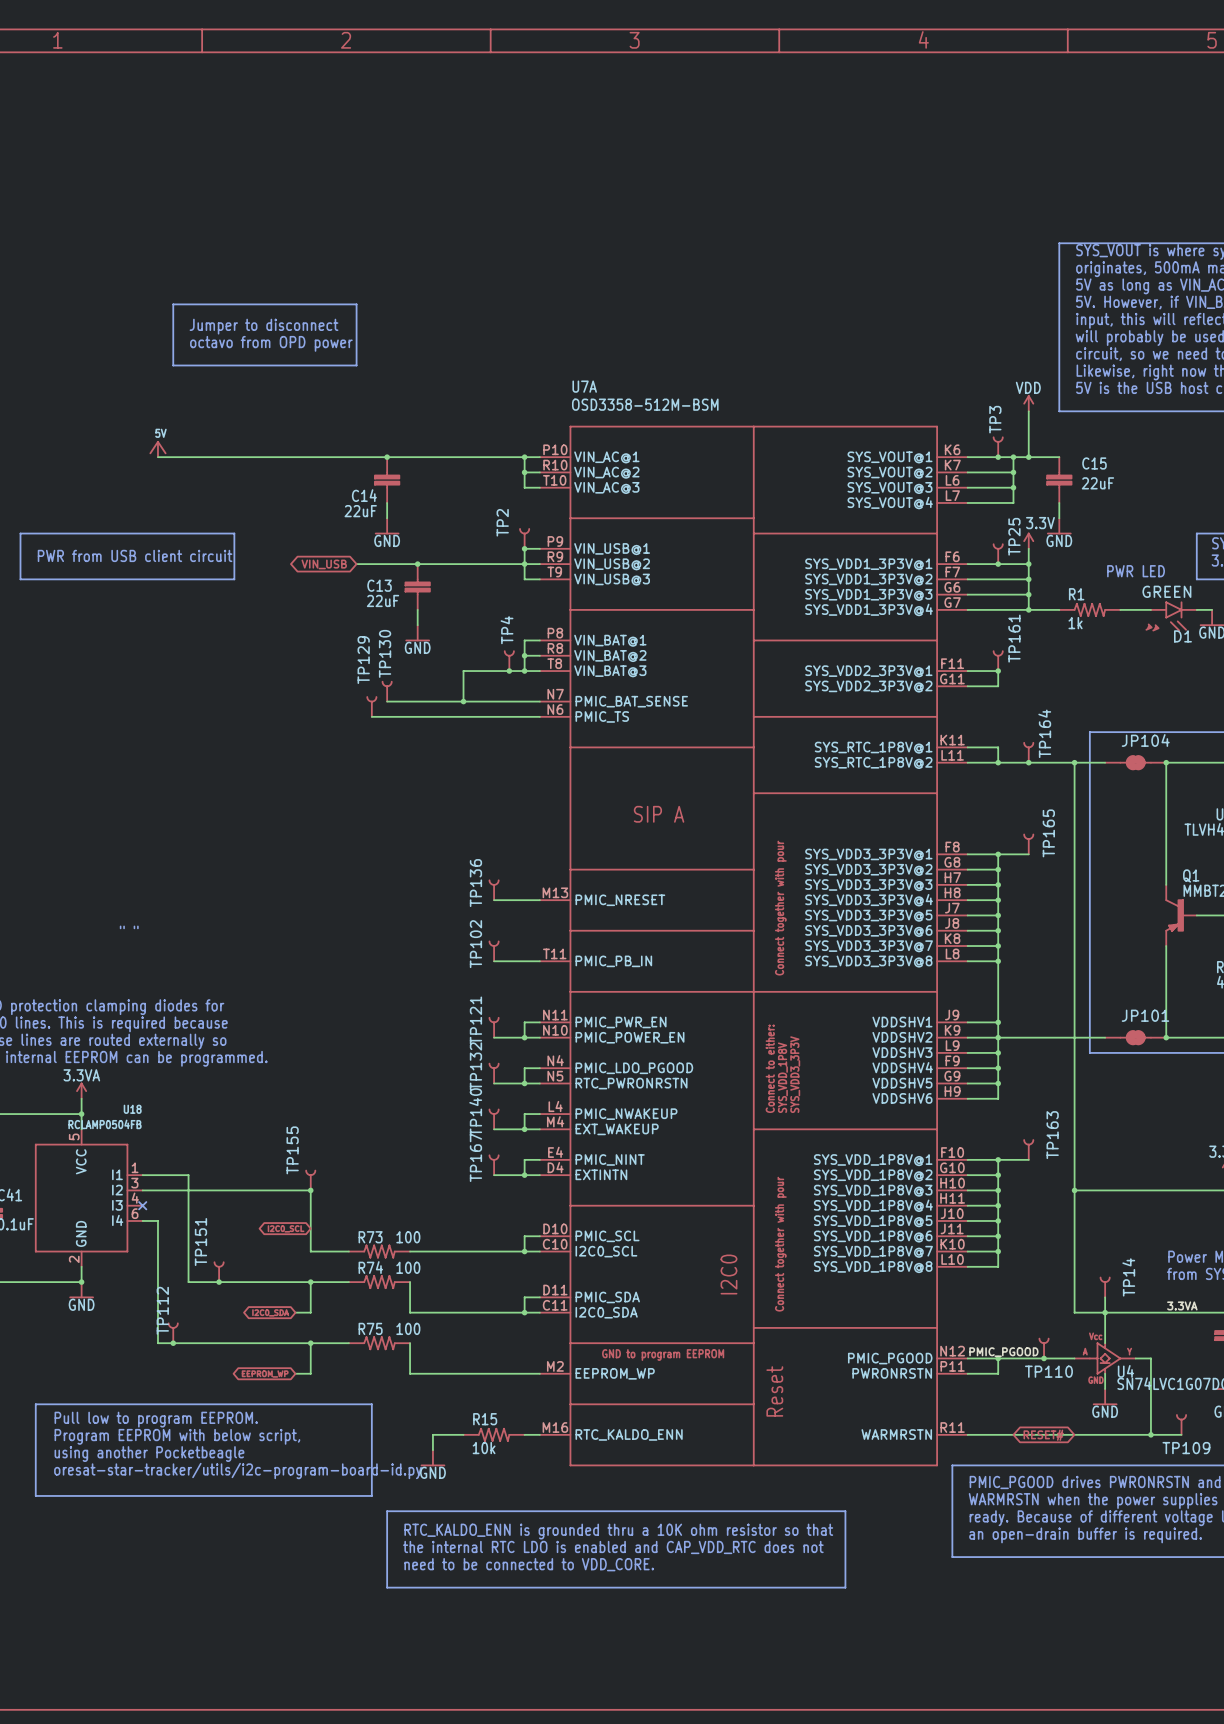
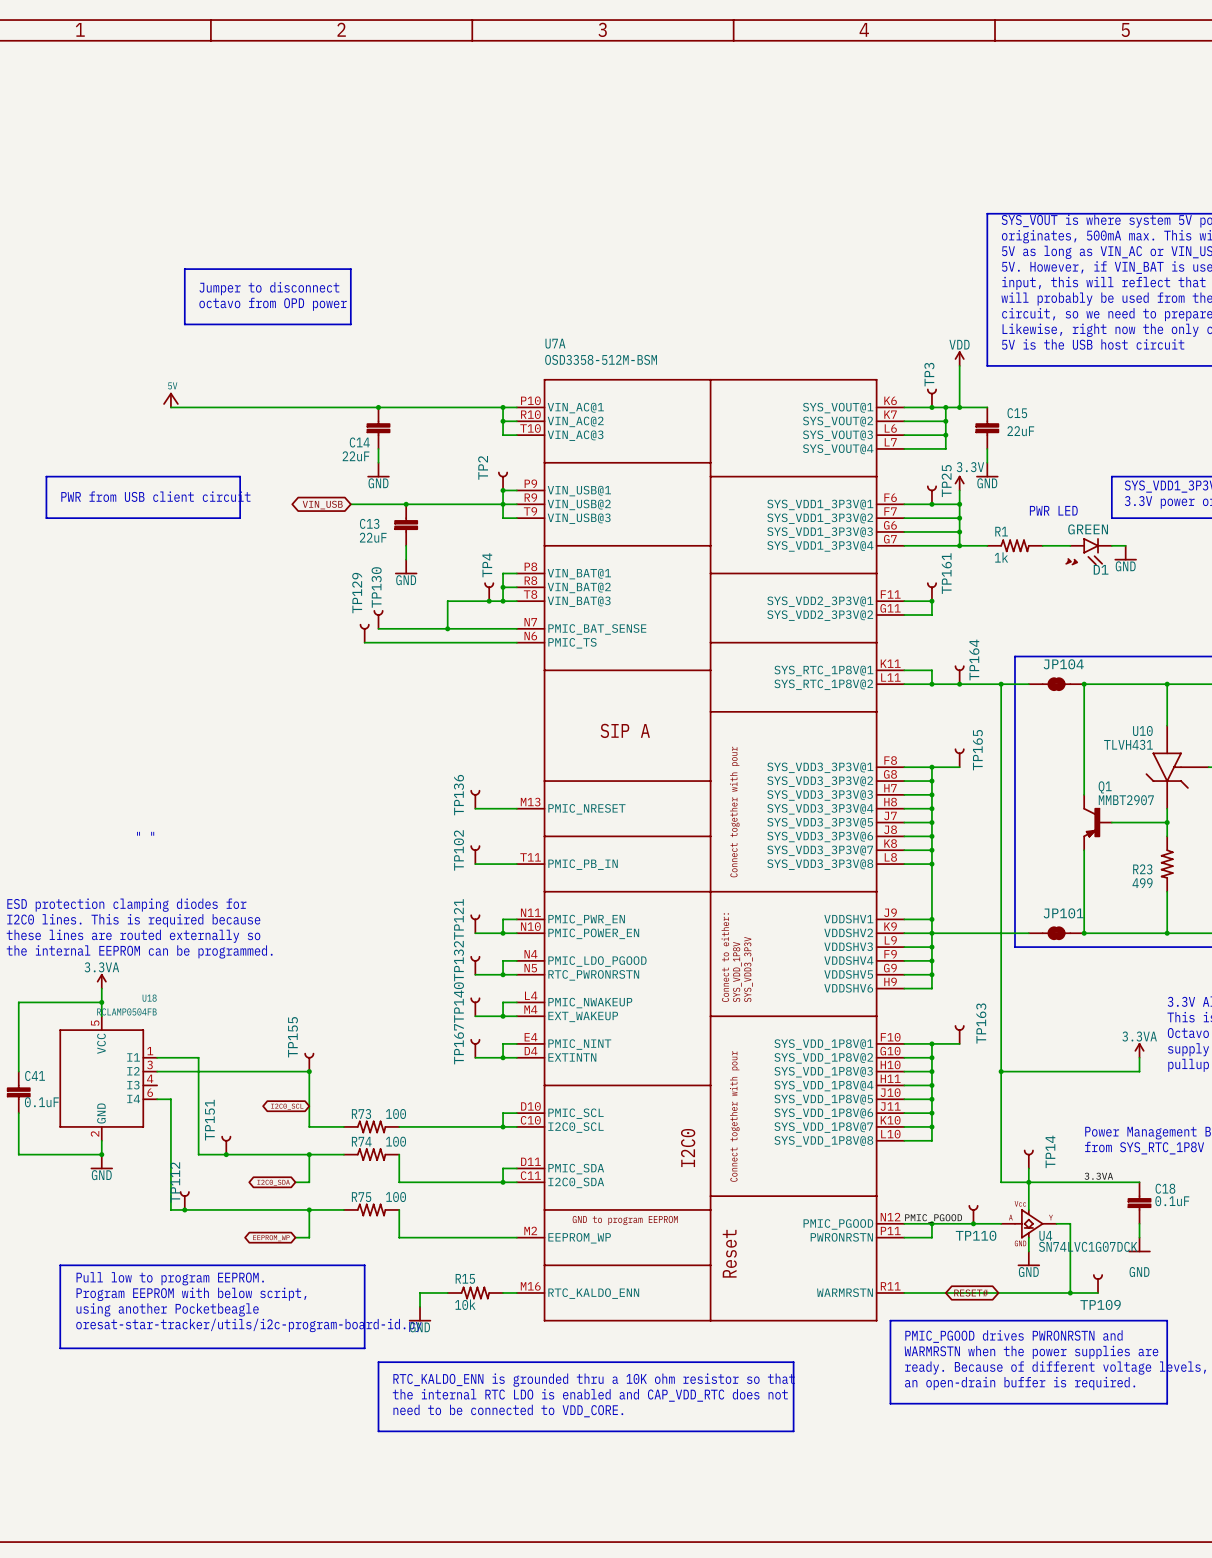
no-connect mark: (142, 1205) -> none

